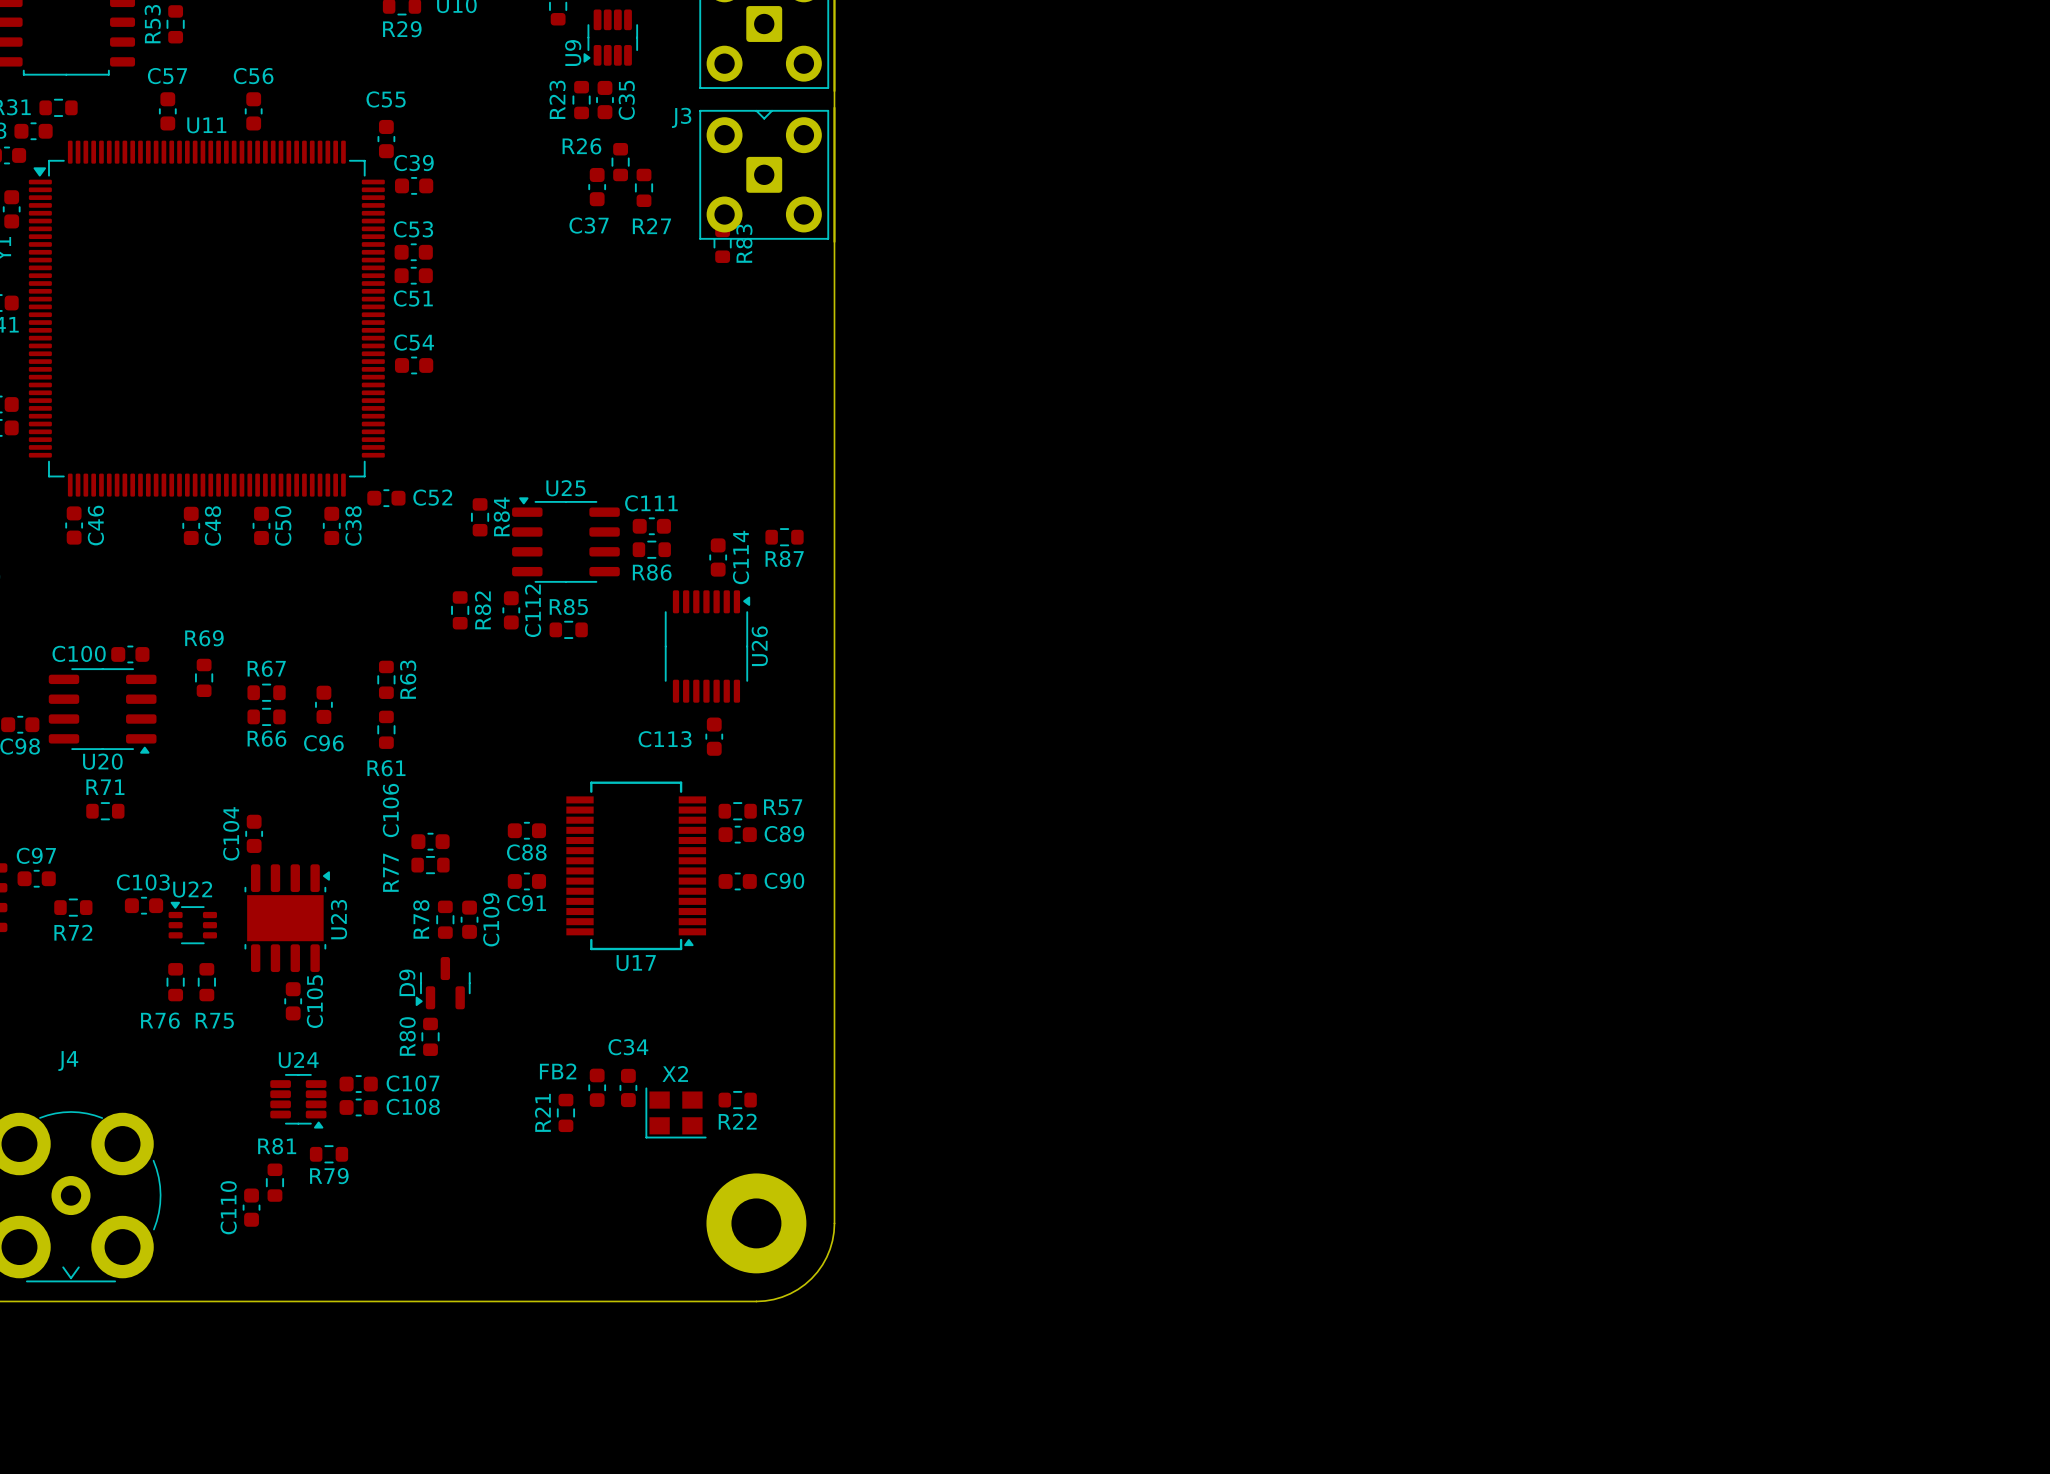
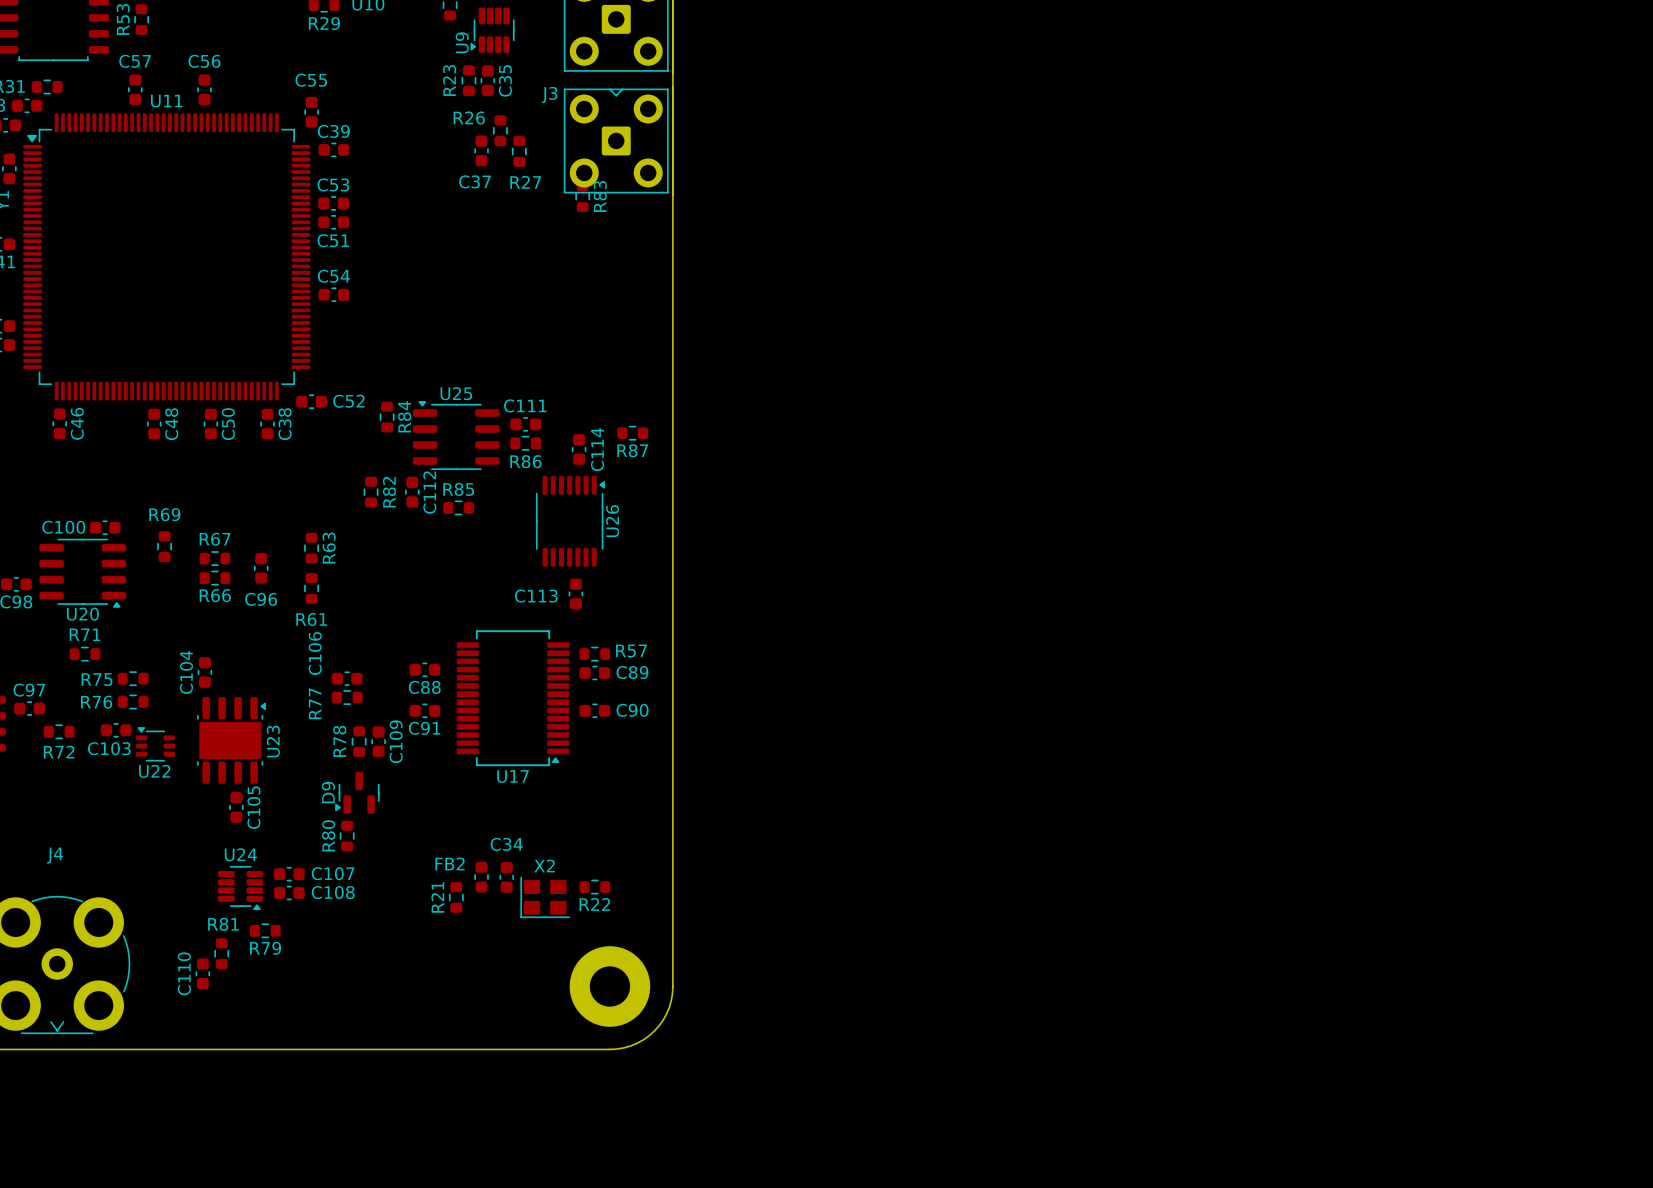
C103 name position: C103 (143, 882) -> C103 (109, 748)
U22 name position: U22 (192, 889) -> U22 (154, 771)
R76 rotation: 0° (175, 982) -> 90° clockwise (133, 701)
R76 position: (175, 982) -> (133, 701)
R75 rotation: 0° (206, 982) -> 90° clockwise (133, 678)
R75 position: (206, 982) -> (133, 678)

